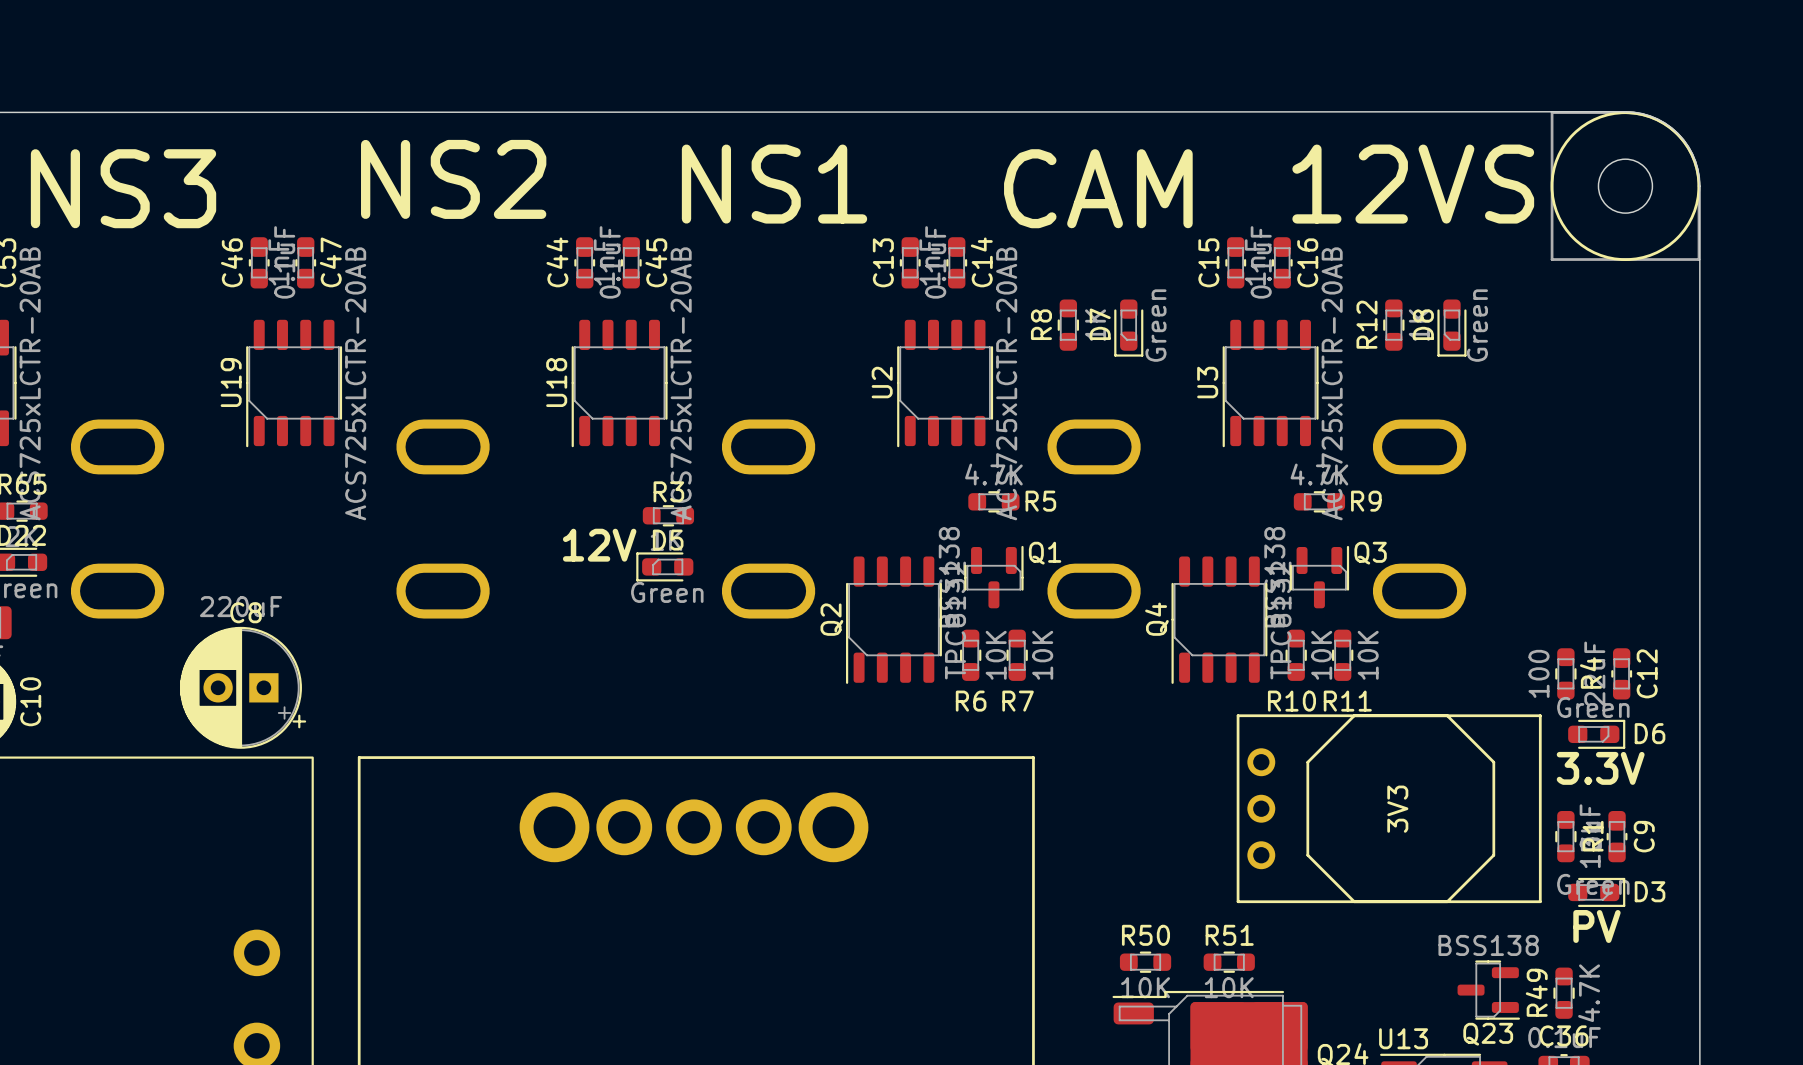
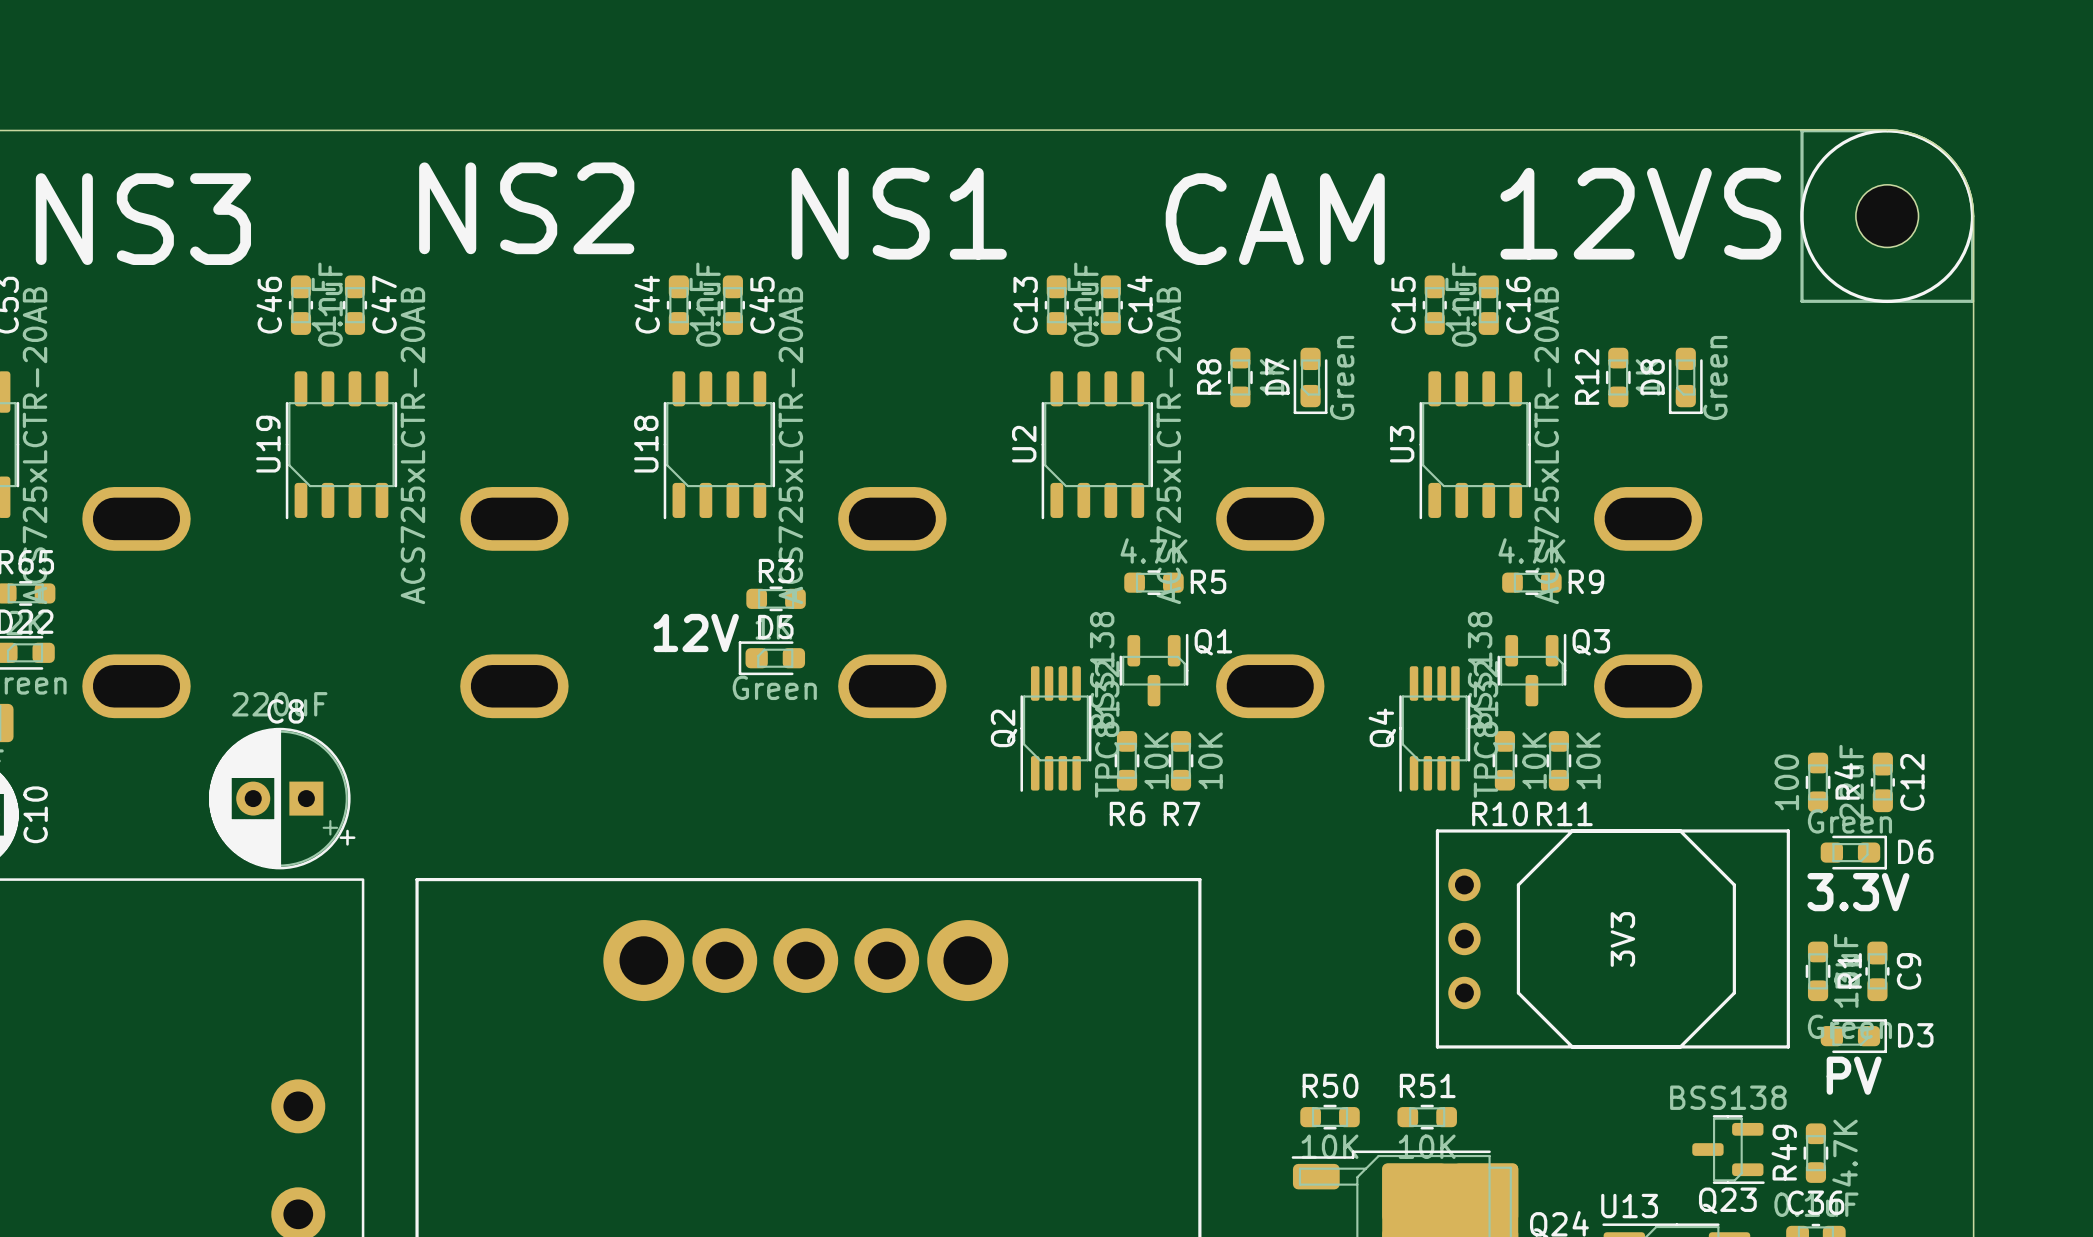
Q2 footprint: [845, 556, 942, 684] -> [1020, 666, 1092, 792]
Q4 footprint: [1171, 556, 1268, 684] -> [1399, 666, 1471, 792]

